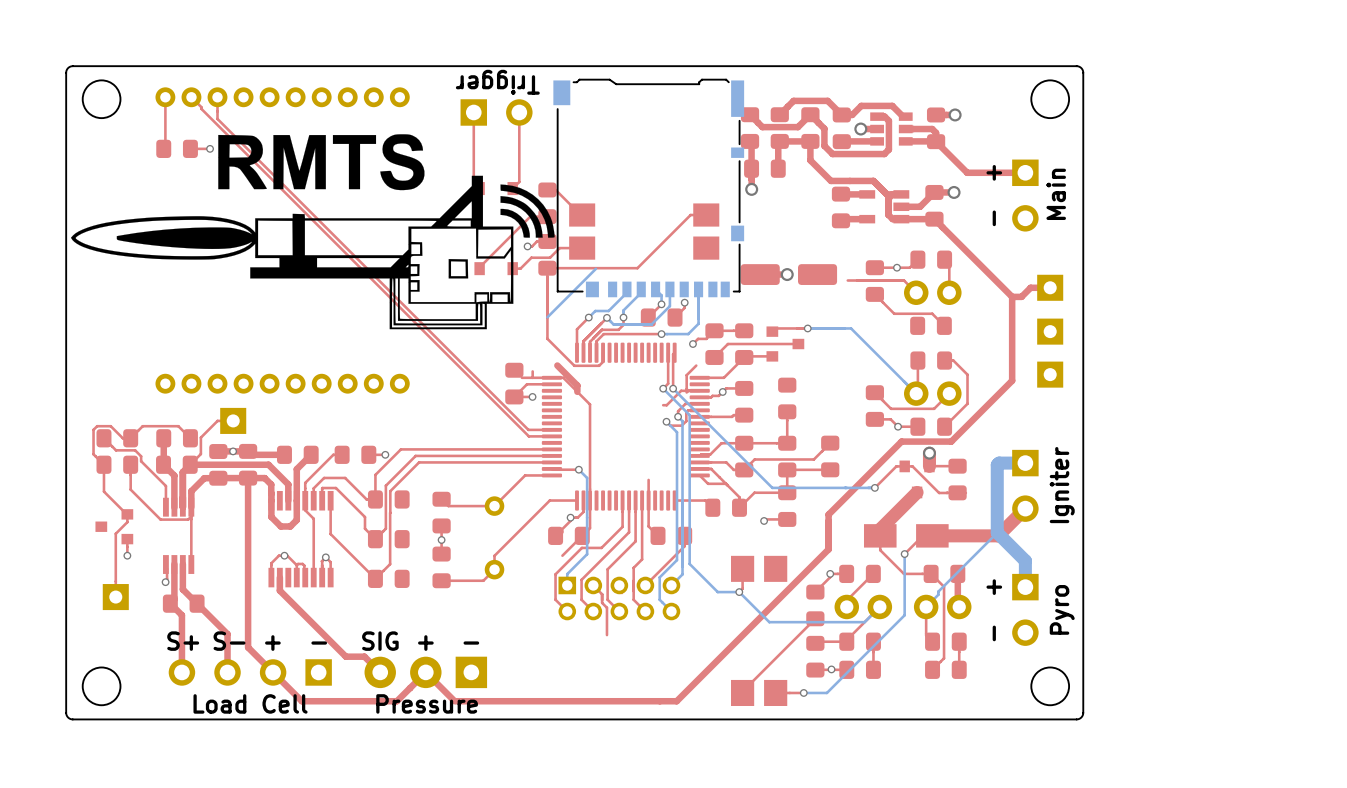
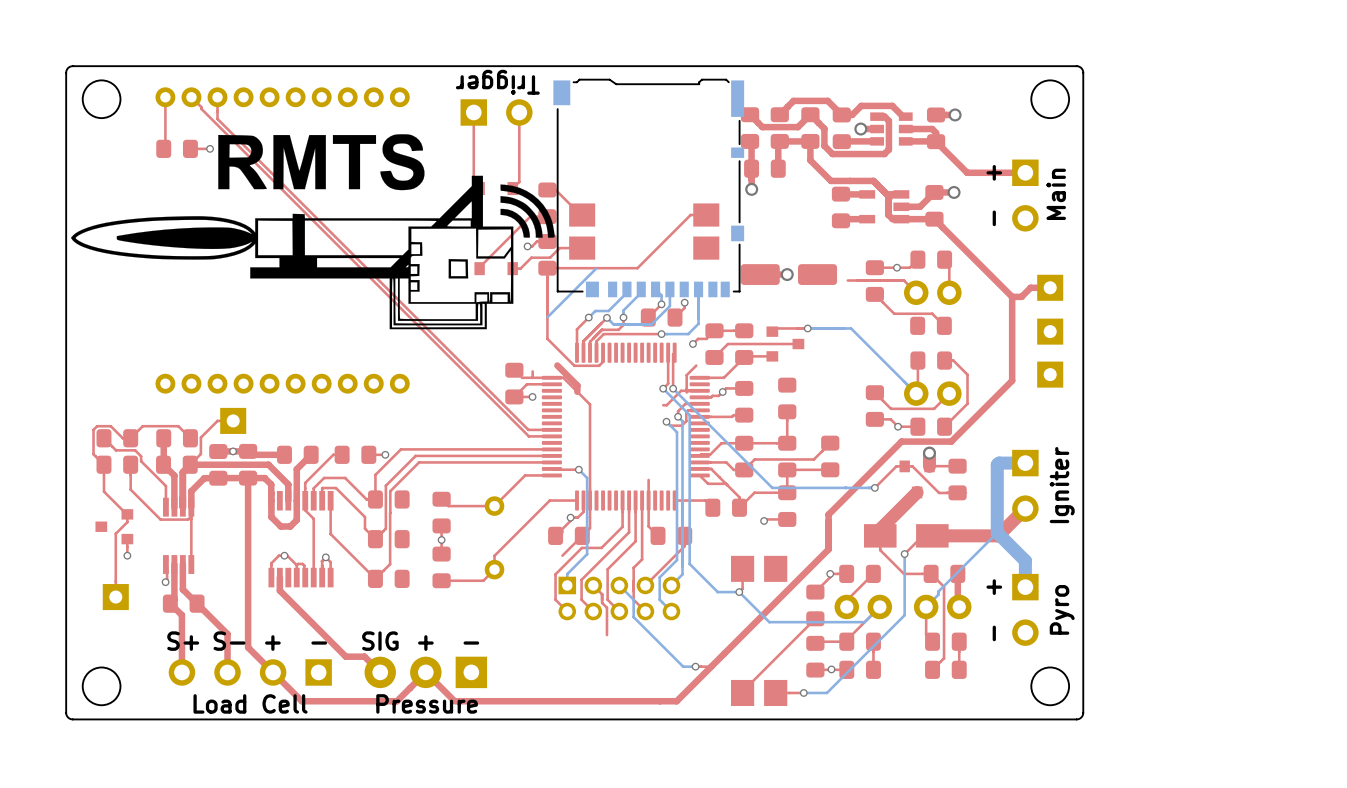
bottom track: none -> (619, 585) (633, 599) (633, 617) (683, 666) (695, 666)
via: none -> (695, 666)
top track: none -> (711, 666) (695, 666)

